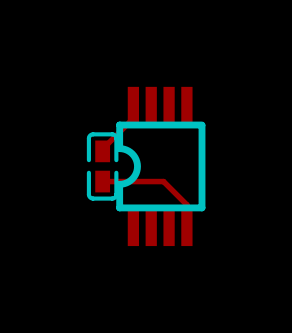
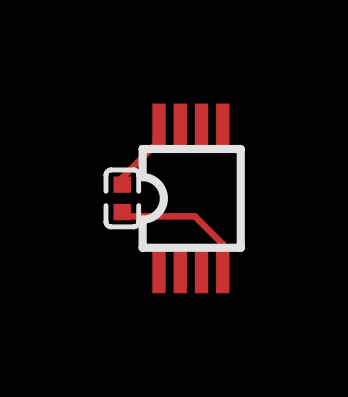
part footprint: [86, 132, 119, 201] -> [103, 167, 142, 230]

